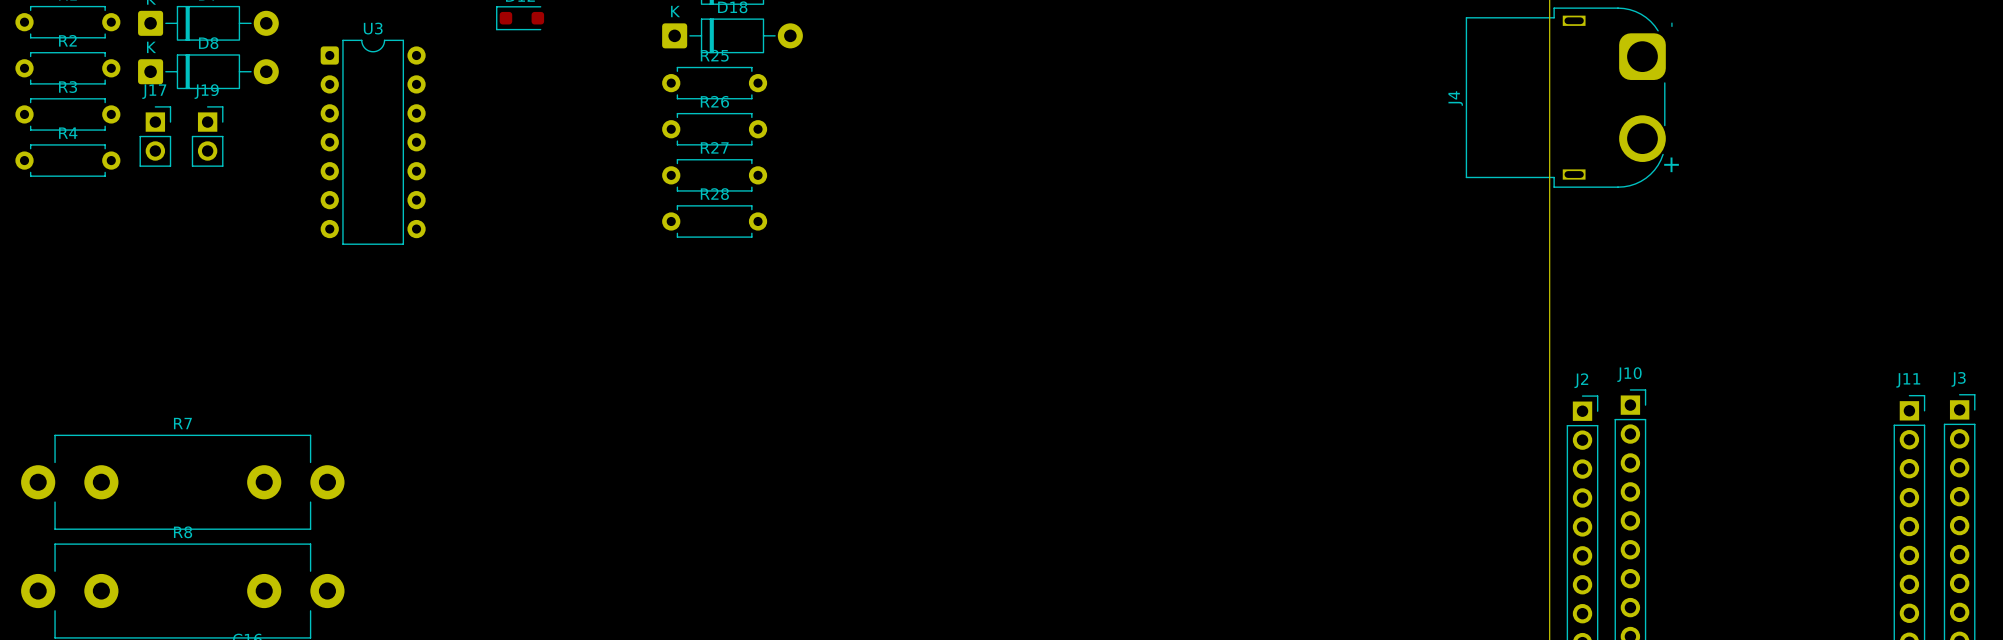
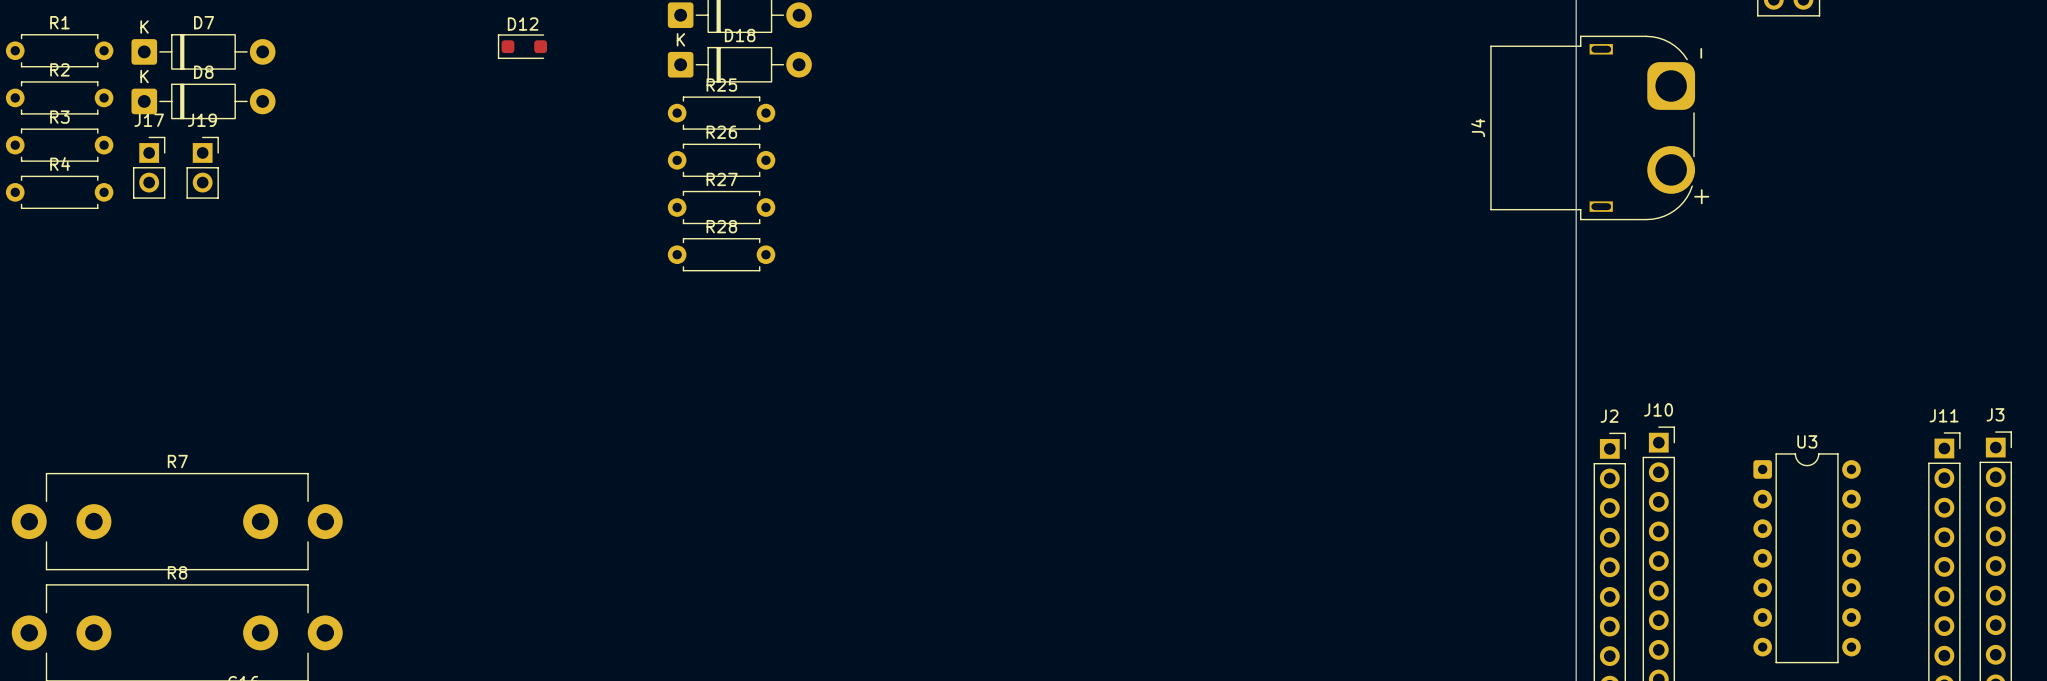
U3 position: (373, 142) -> (1807, 558)

